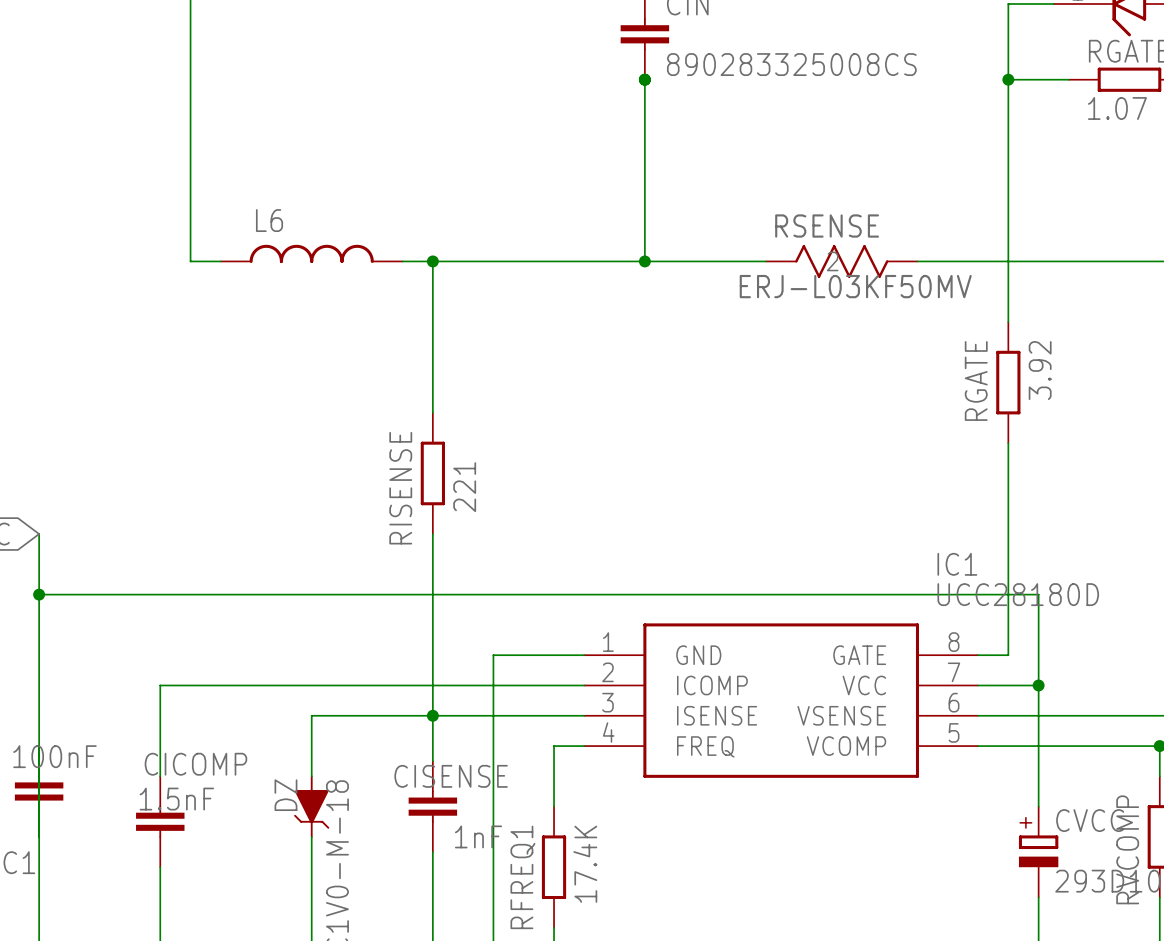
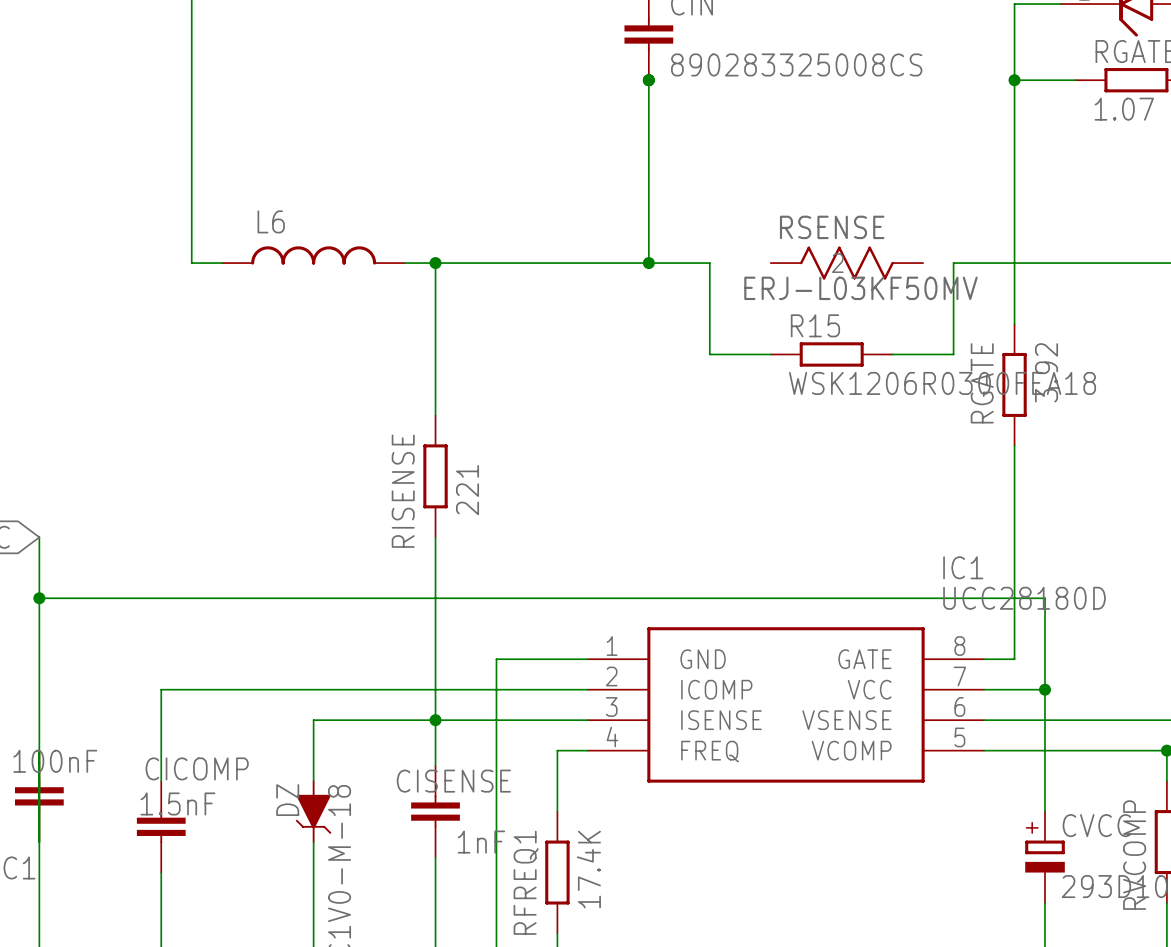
wire: (705, 261) (766, 261) -> (709, 263) (709, 354) (770, 354)
wire: (917, 261) (947, 261) -> (892, 354) (953, 354) (953, 263)
R15: none -> WSK1206R0300FEA18 (831, 354)

